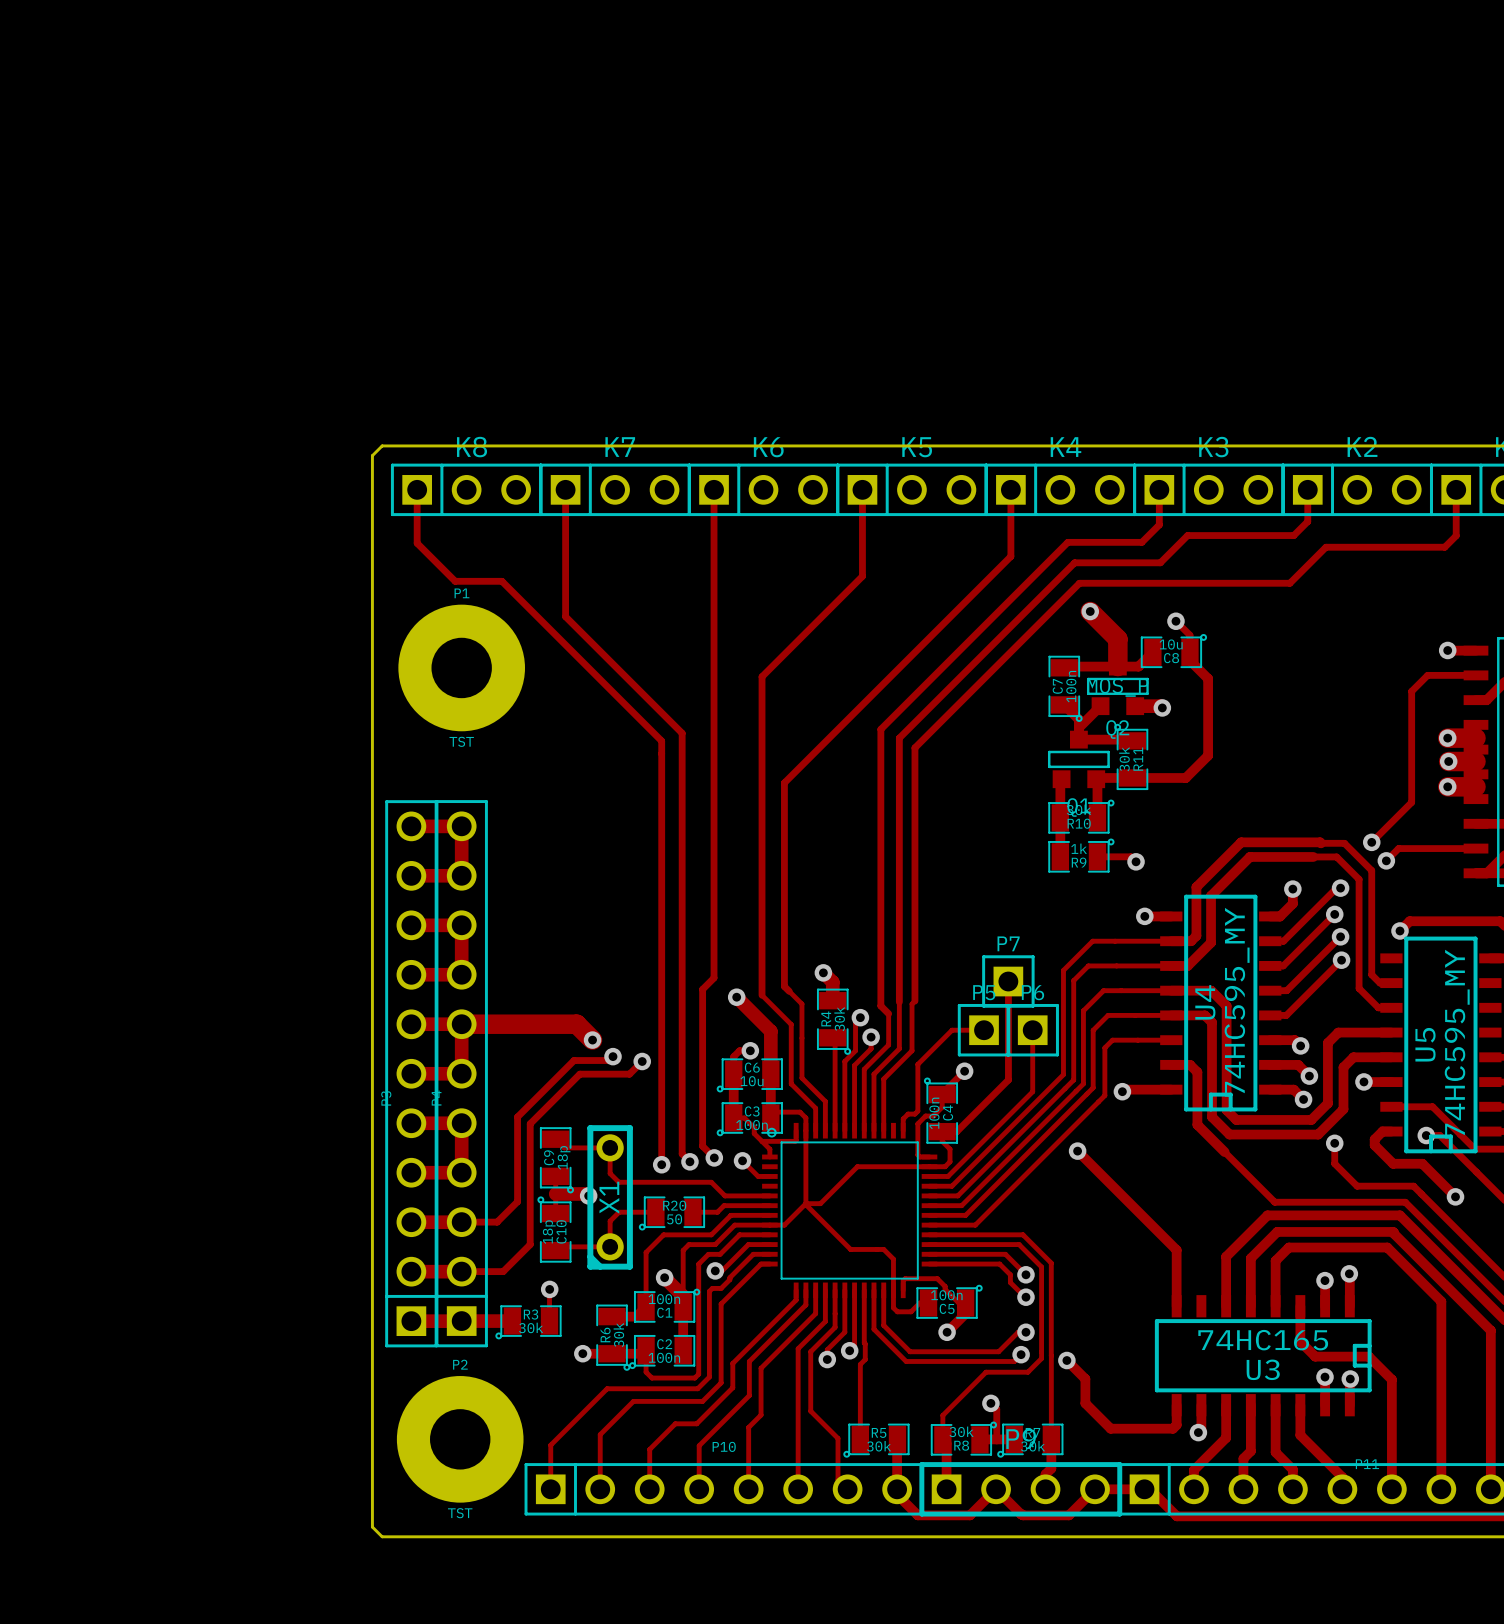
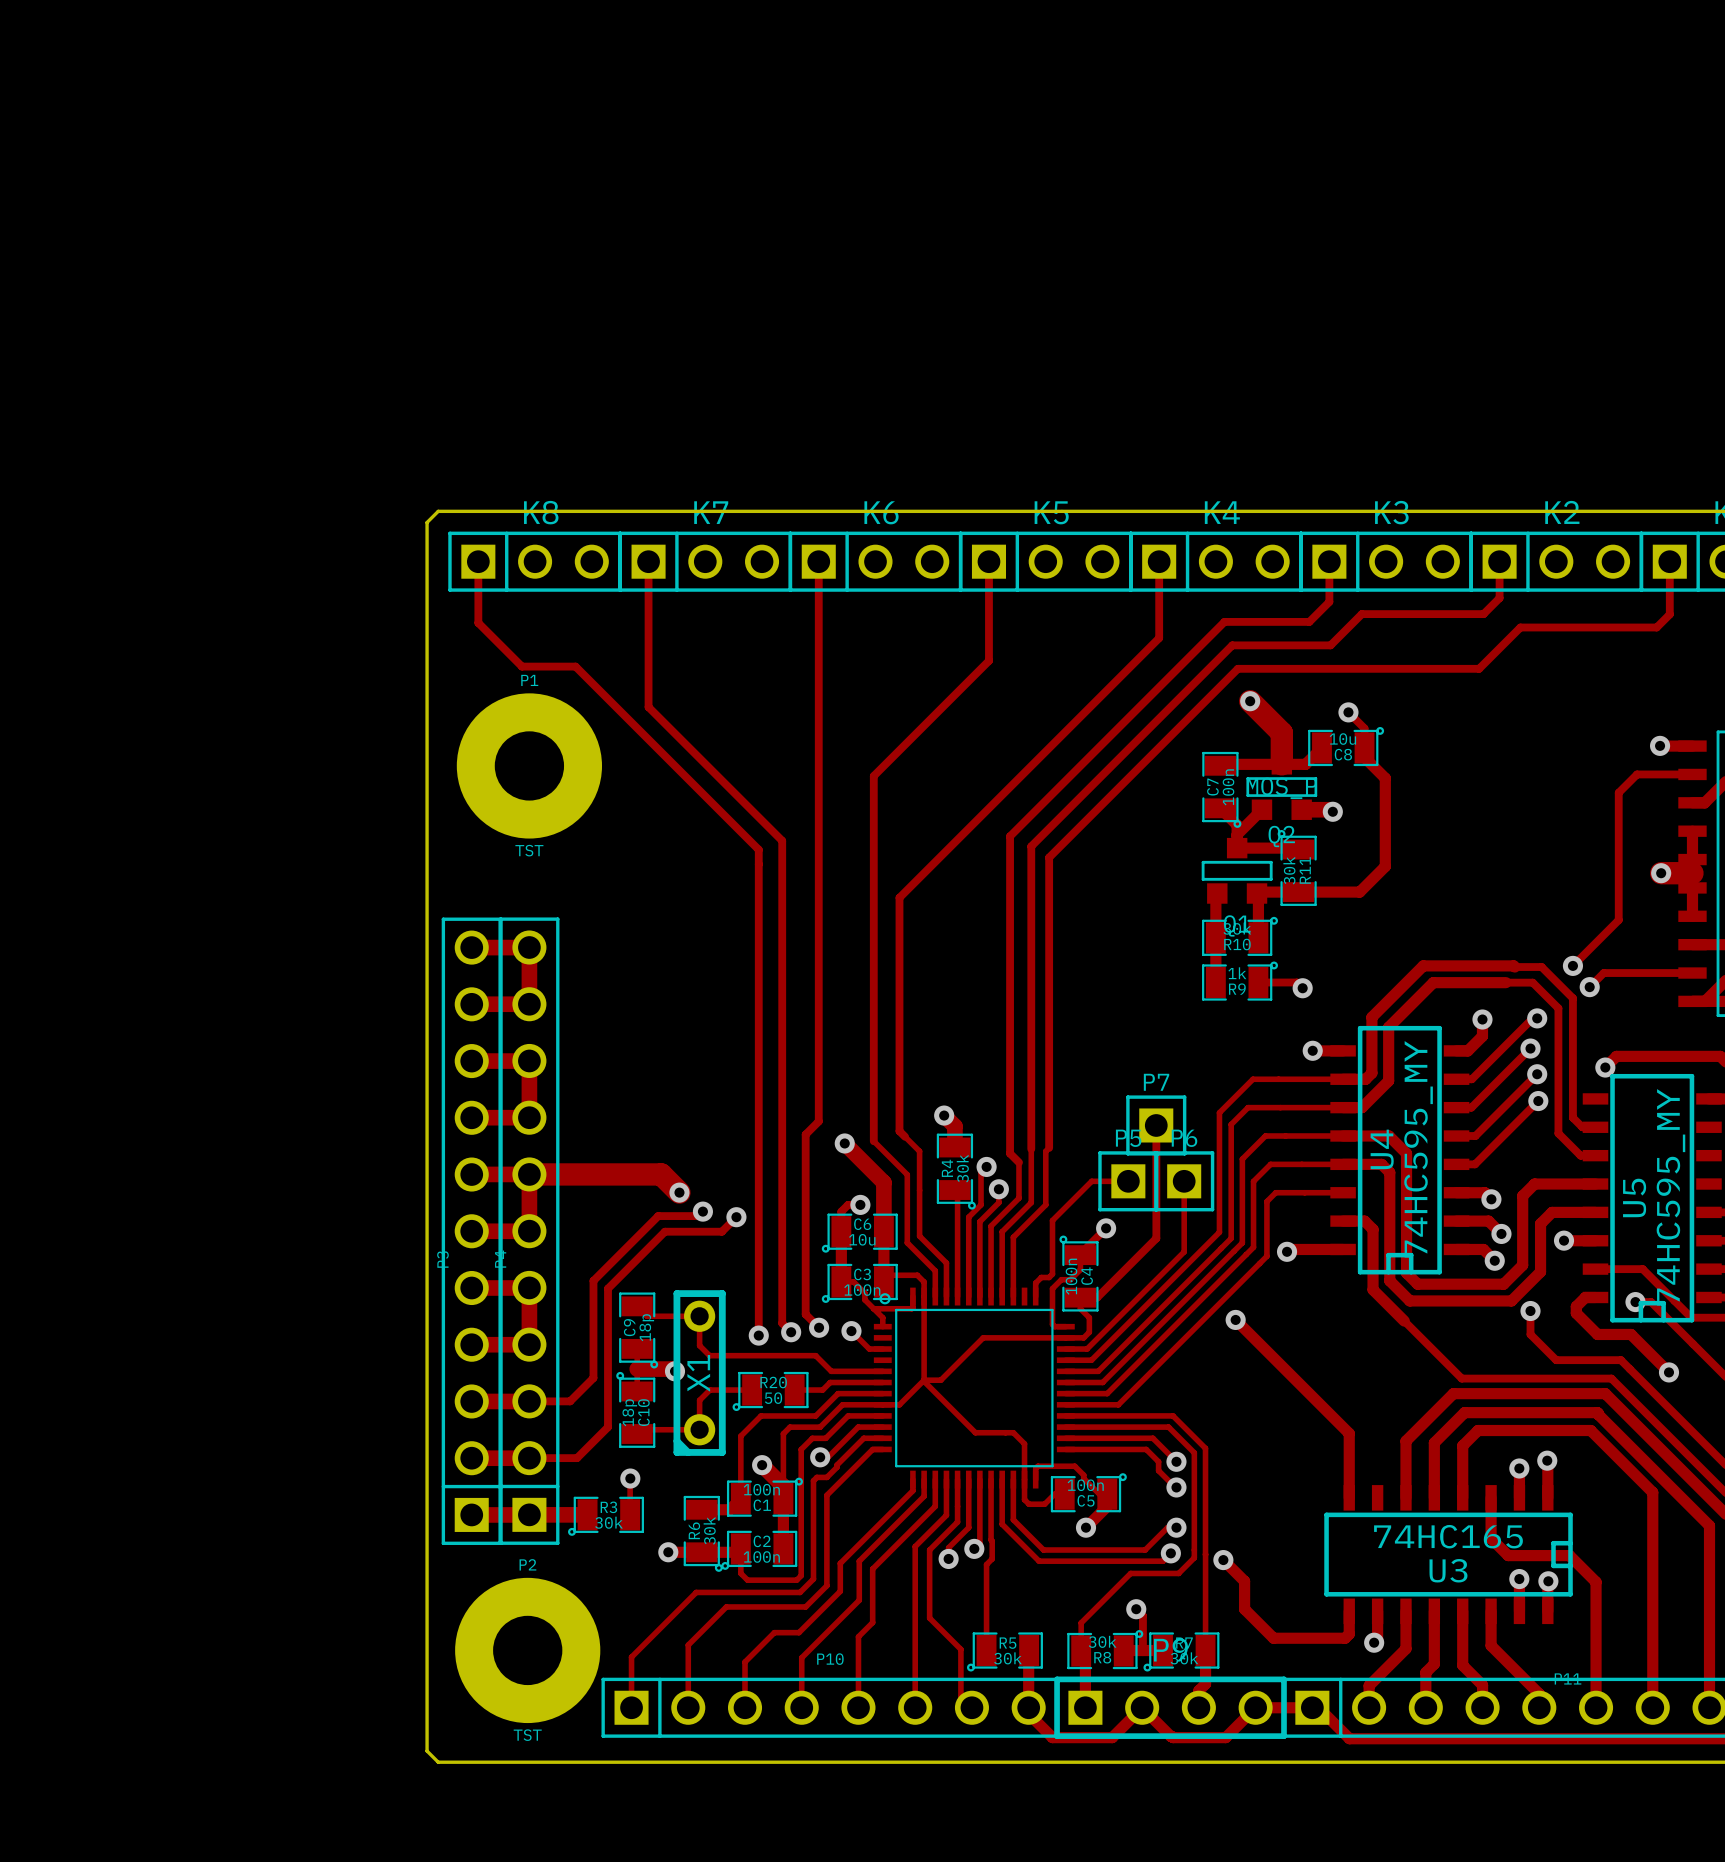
track: (1447, 738) (1476, 738) -> none
via: (1447, 738) -> none
track: (1447, 786) (1476, 786) -> none
via: (1447, 786) -> none

